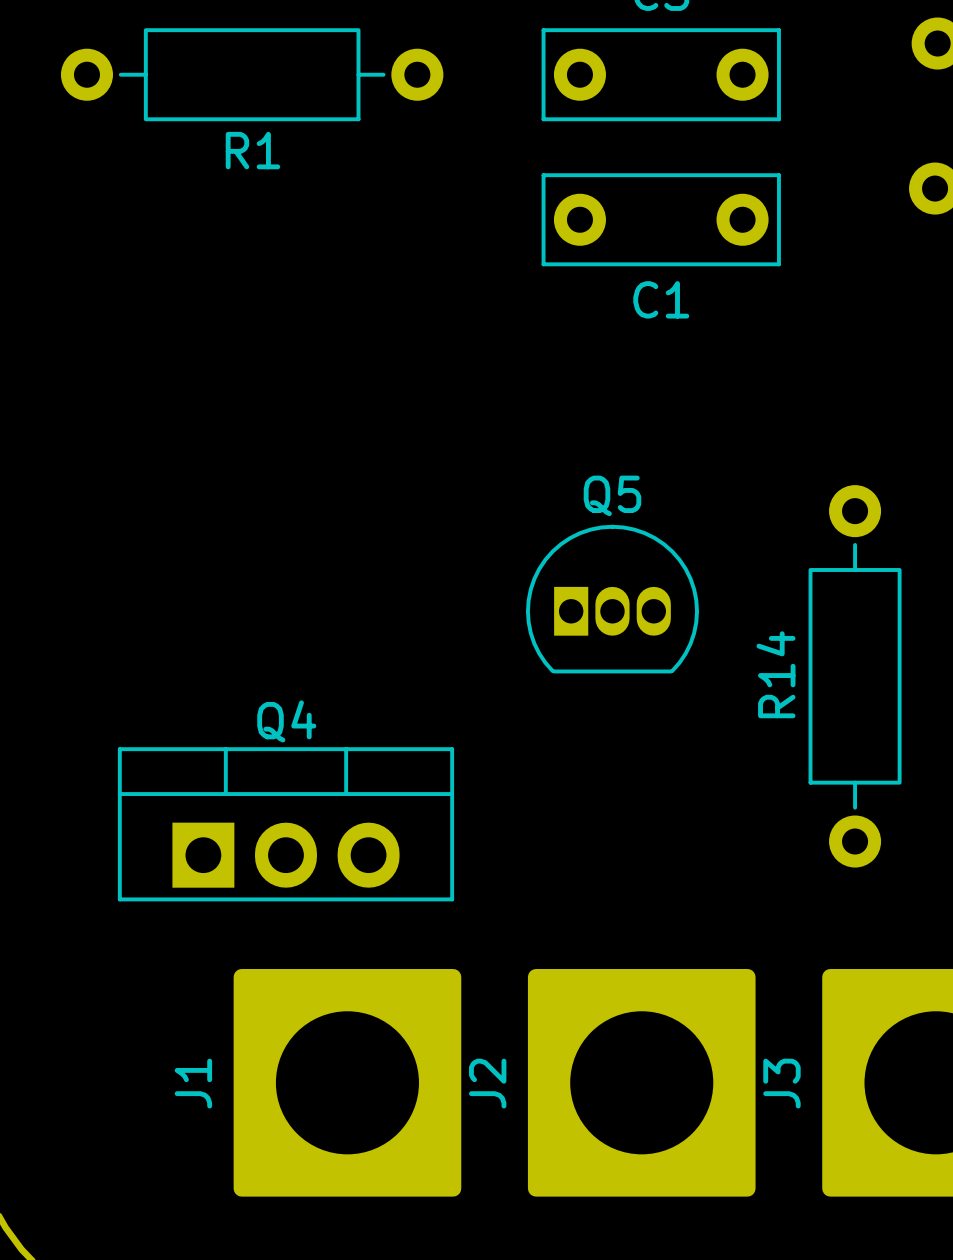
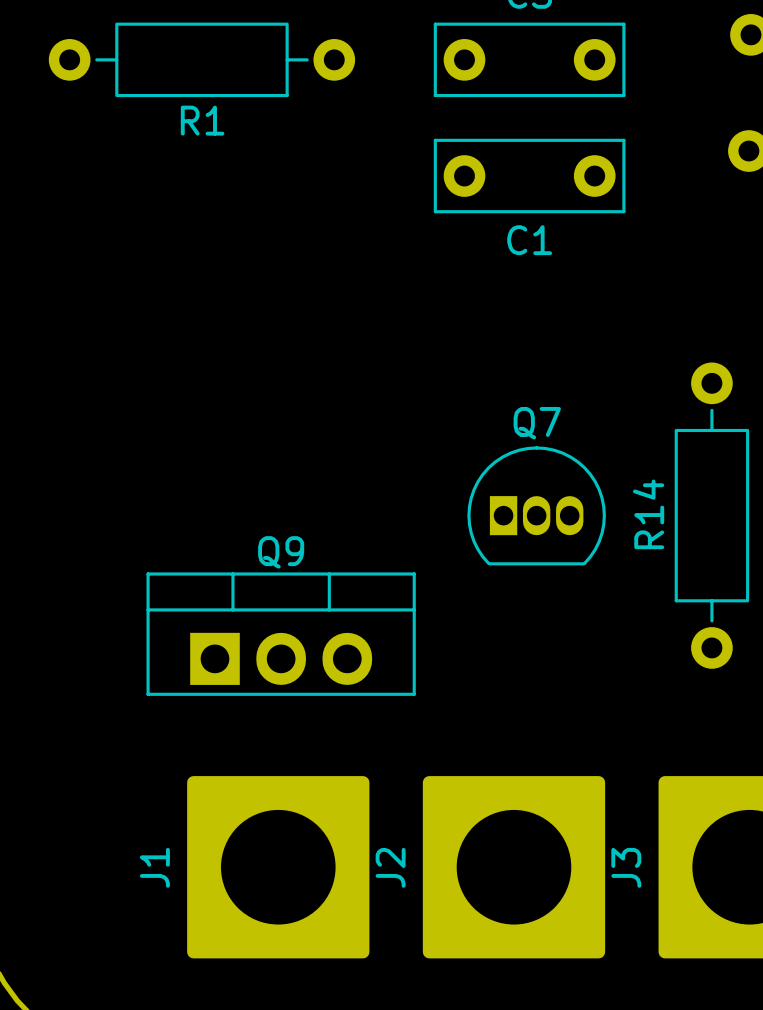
Q5: (612, 599) -> none
Q7: none -> (536, 505)
R14 position: (855, 676) -> (711, 515)
Q9: none -> (281, 634)
Q4: (285, 824) -> none

